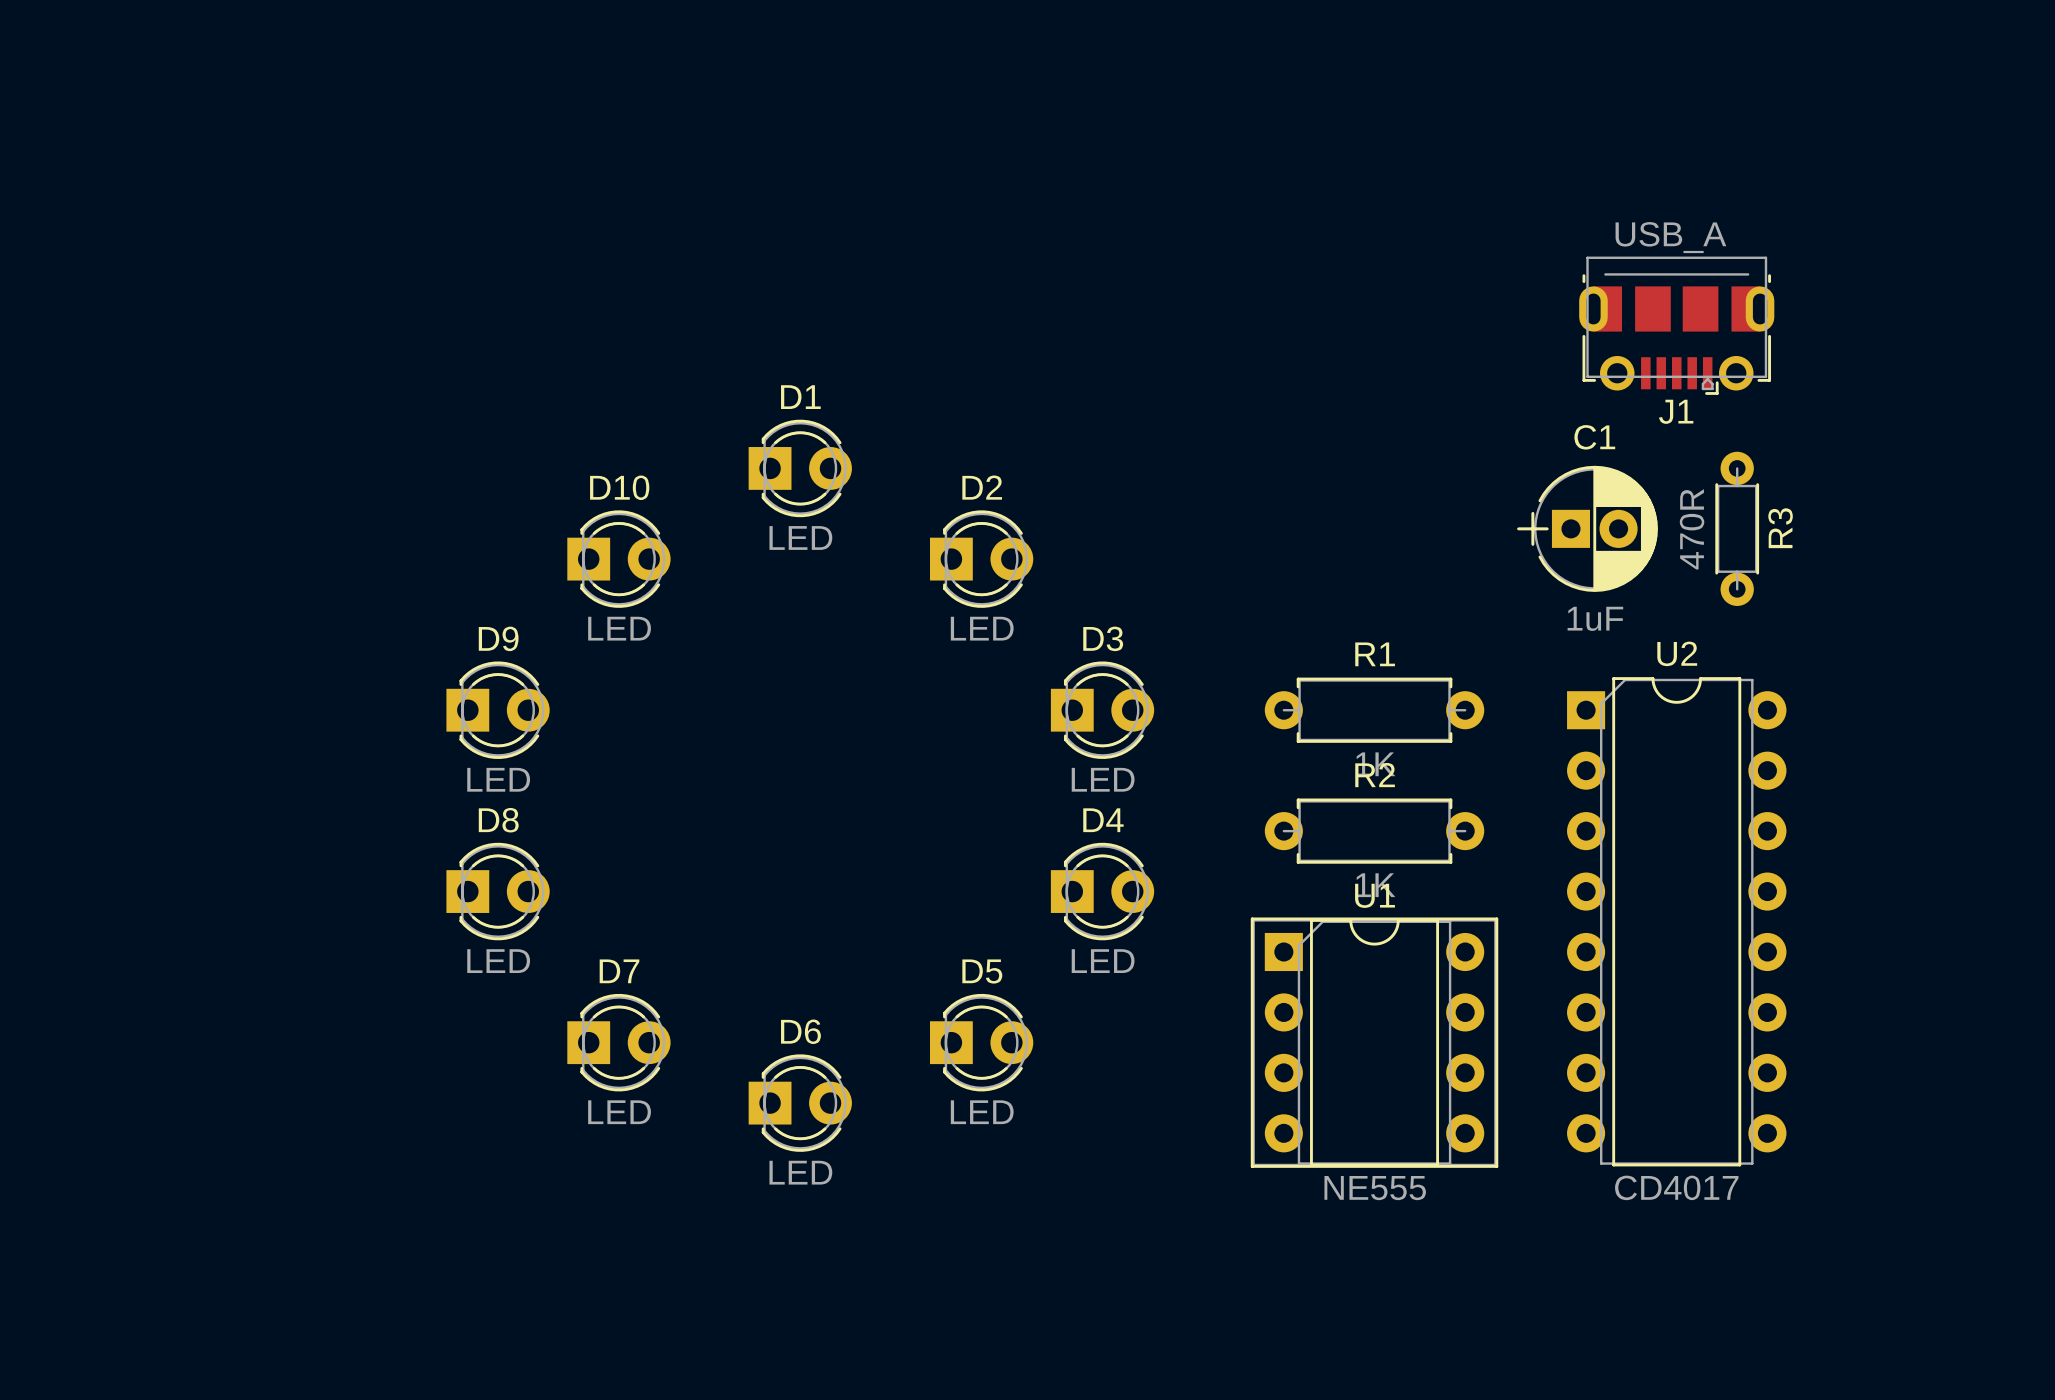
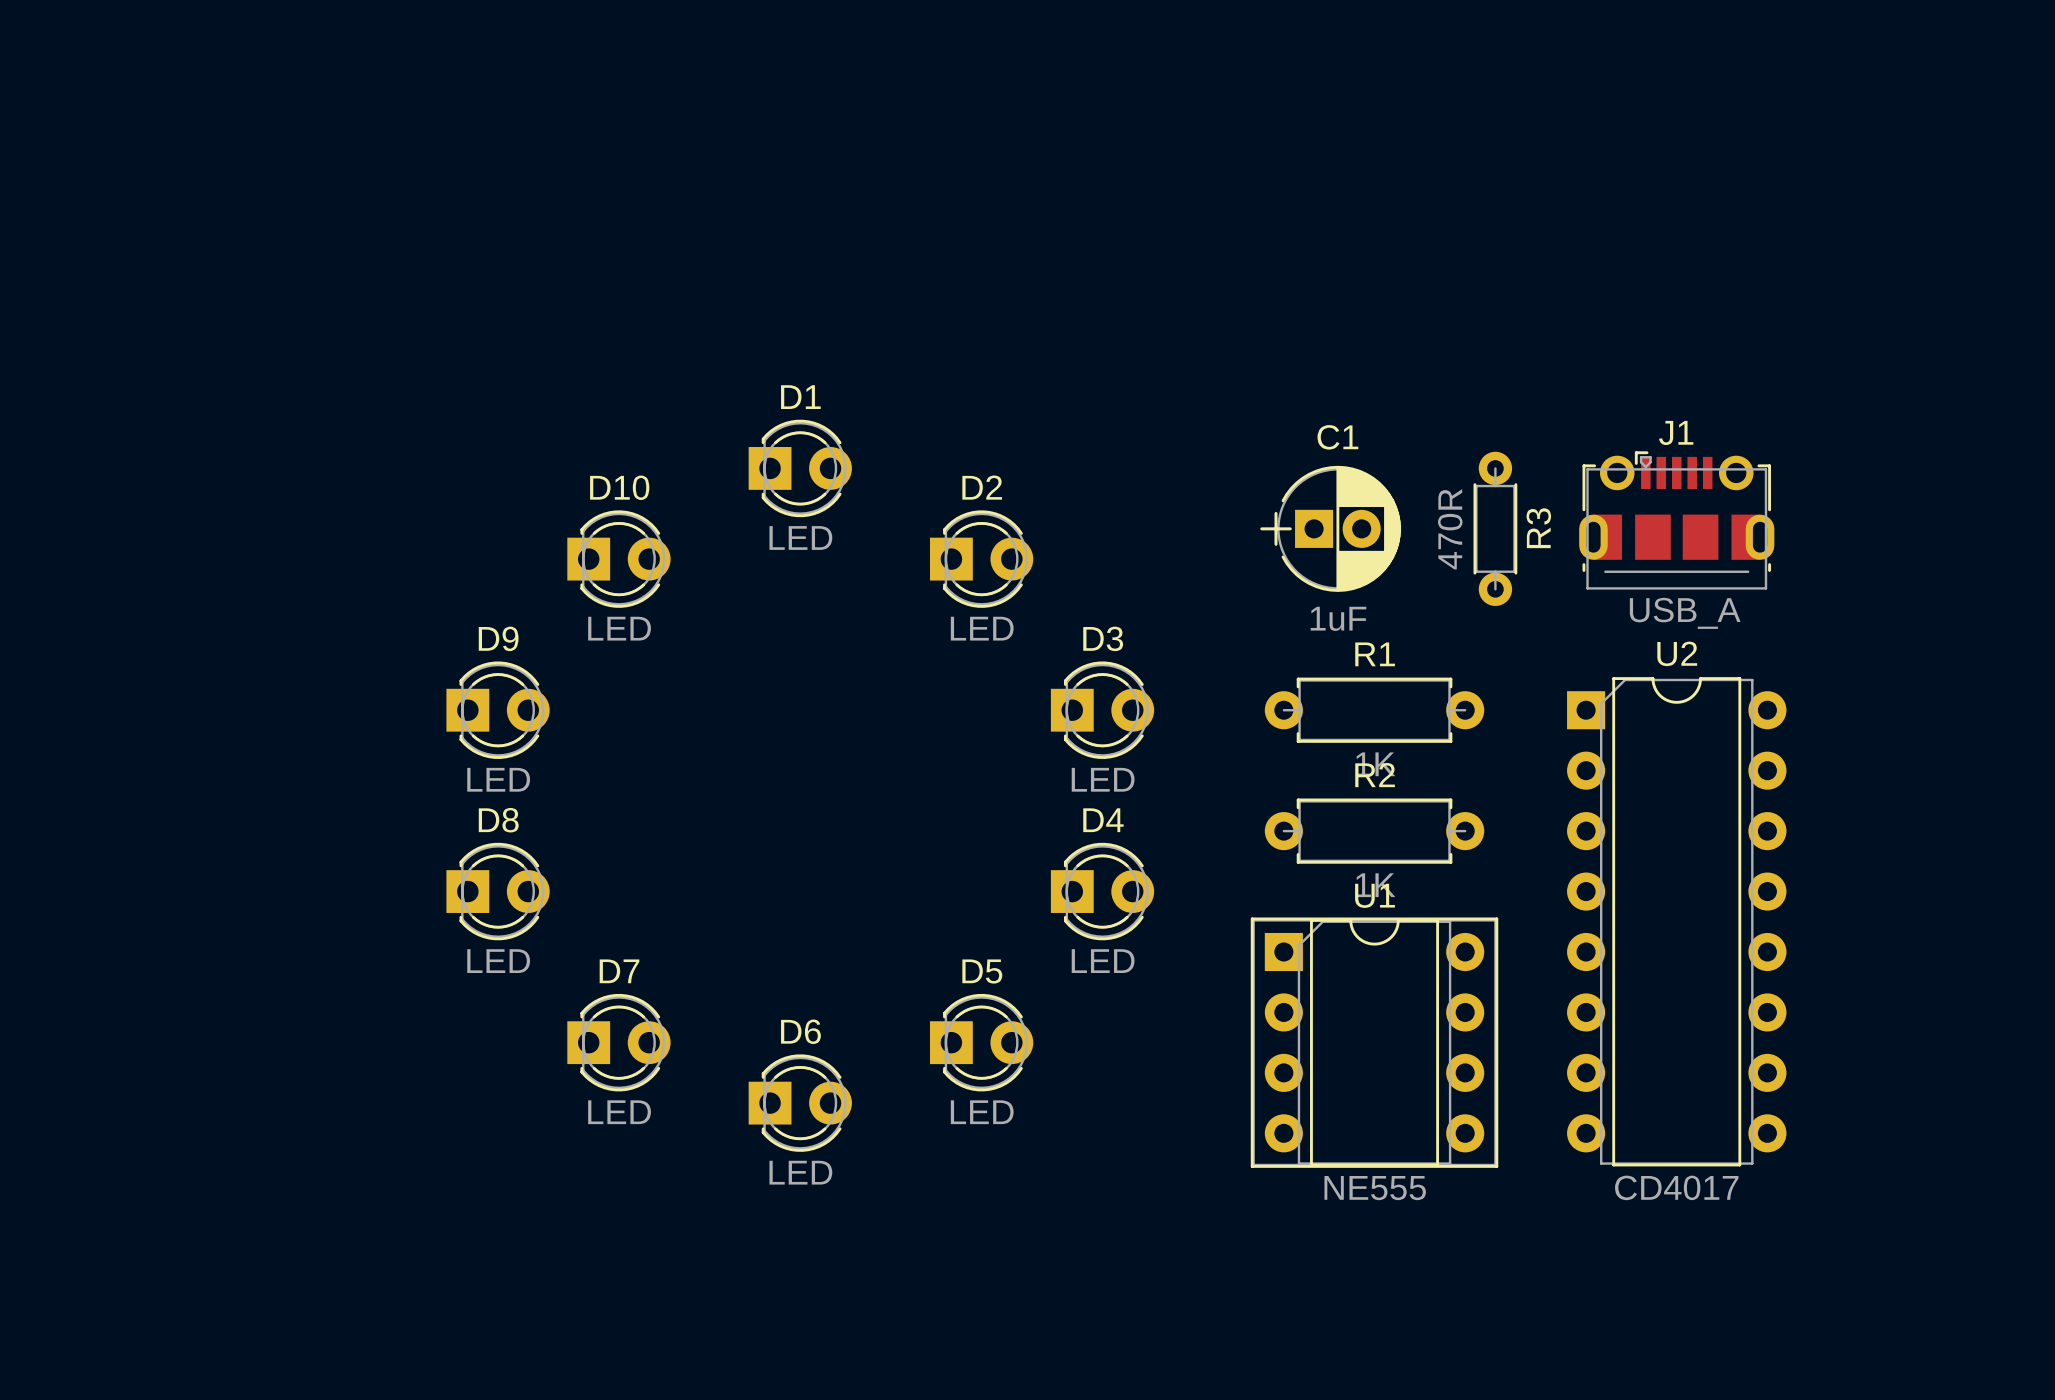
J1 rotation: 0° (1676, 325) -> 180° (1676, 520)
J1 position: (1676, 325) -> (1676, 520)
C1 position: (1587, 528) -> (1330, 528)
R3 position: (1737, 528) -> (1495, 528)

